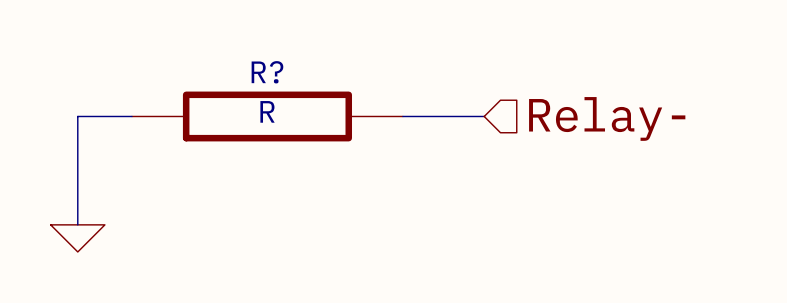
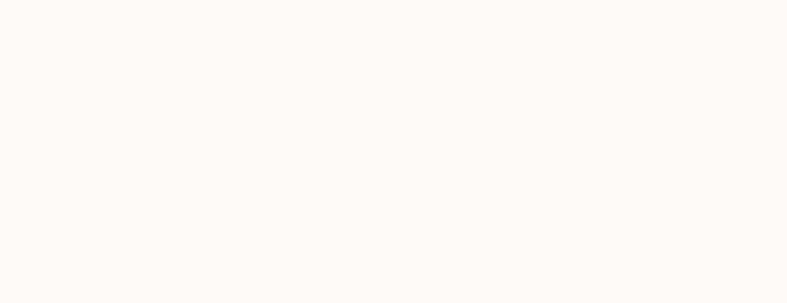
wire: (131, 116) (77, 116) (77, 224) -> none
R?: R (267, 116) -> none
wire: (402, 116) (484, 116) -> none
hierarchical label: Relay- (607, 118) -> none
power symbol: (77, 238) -> none

